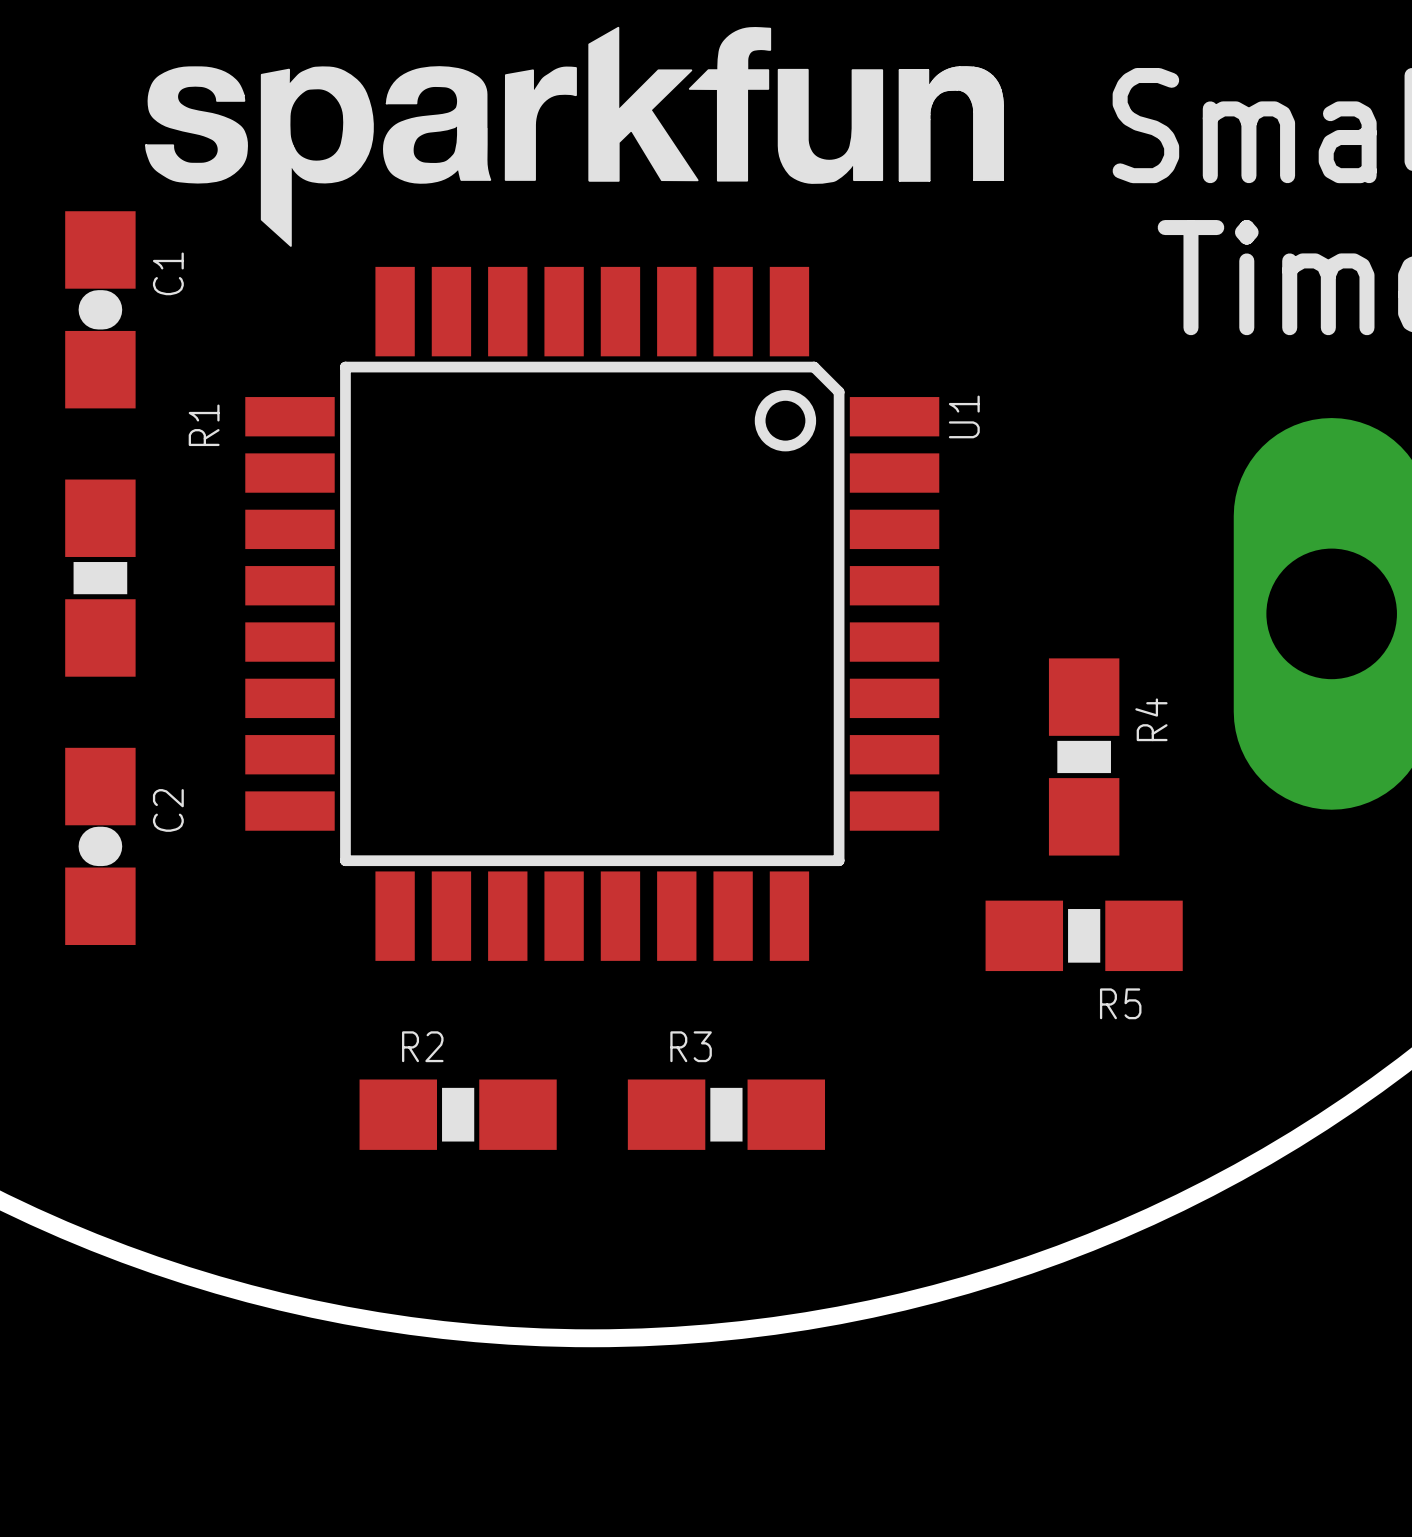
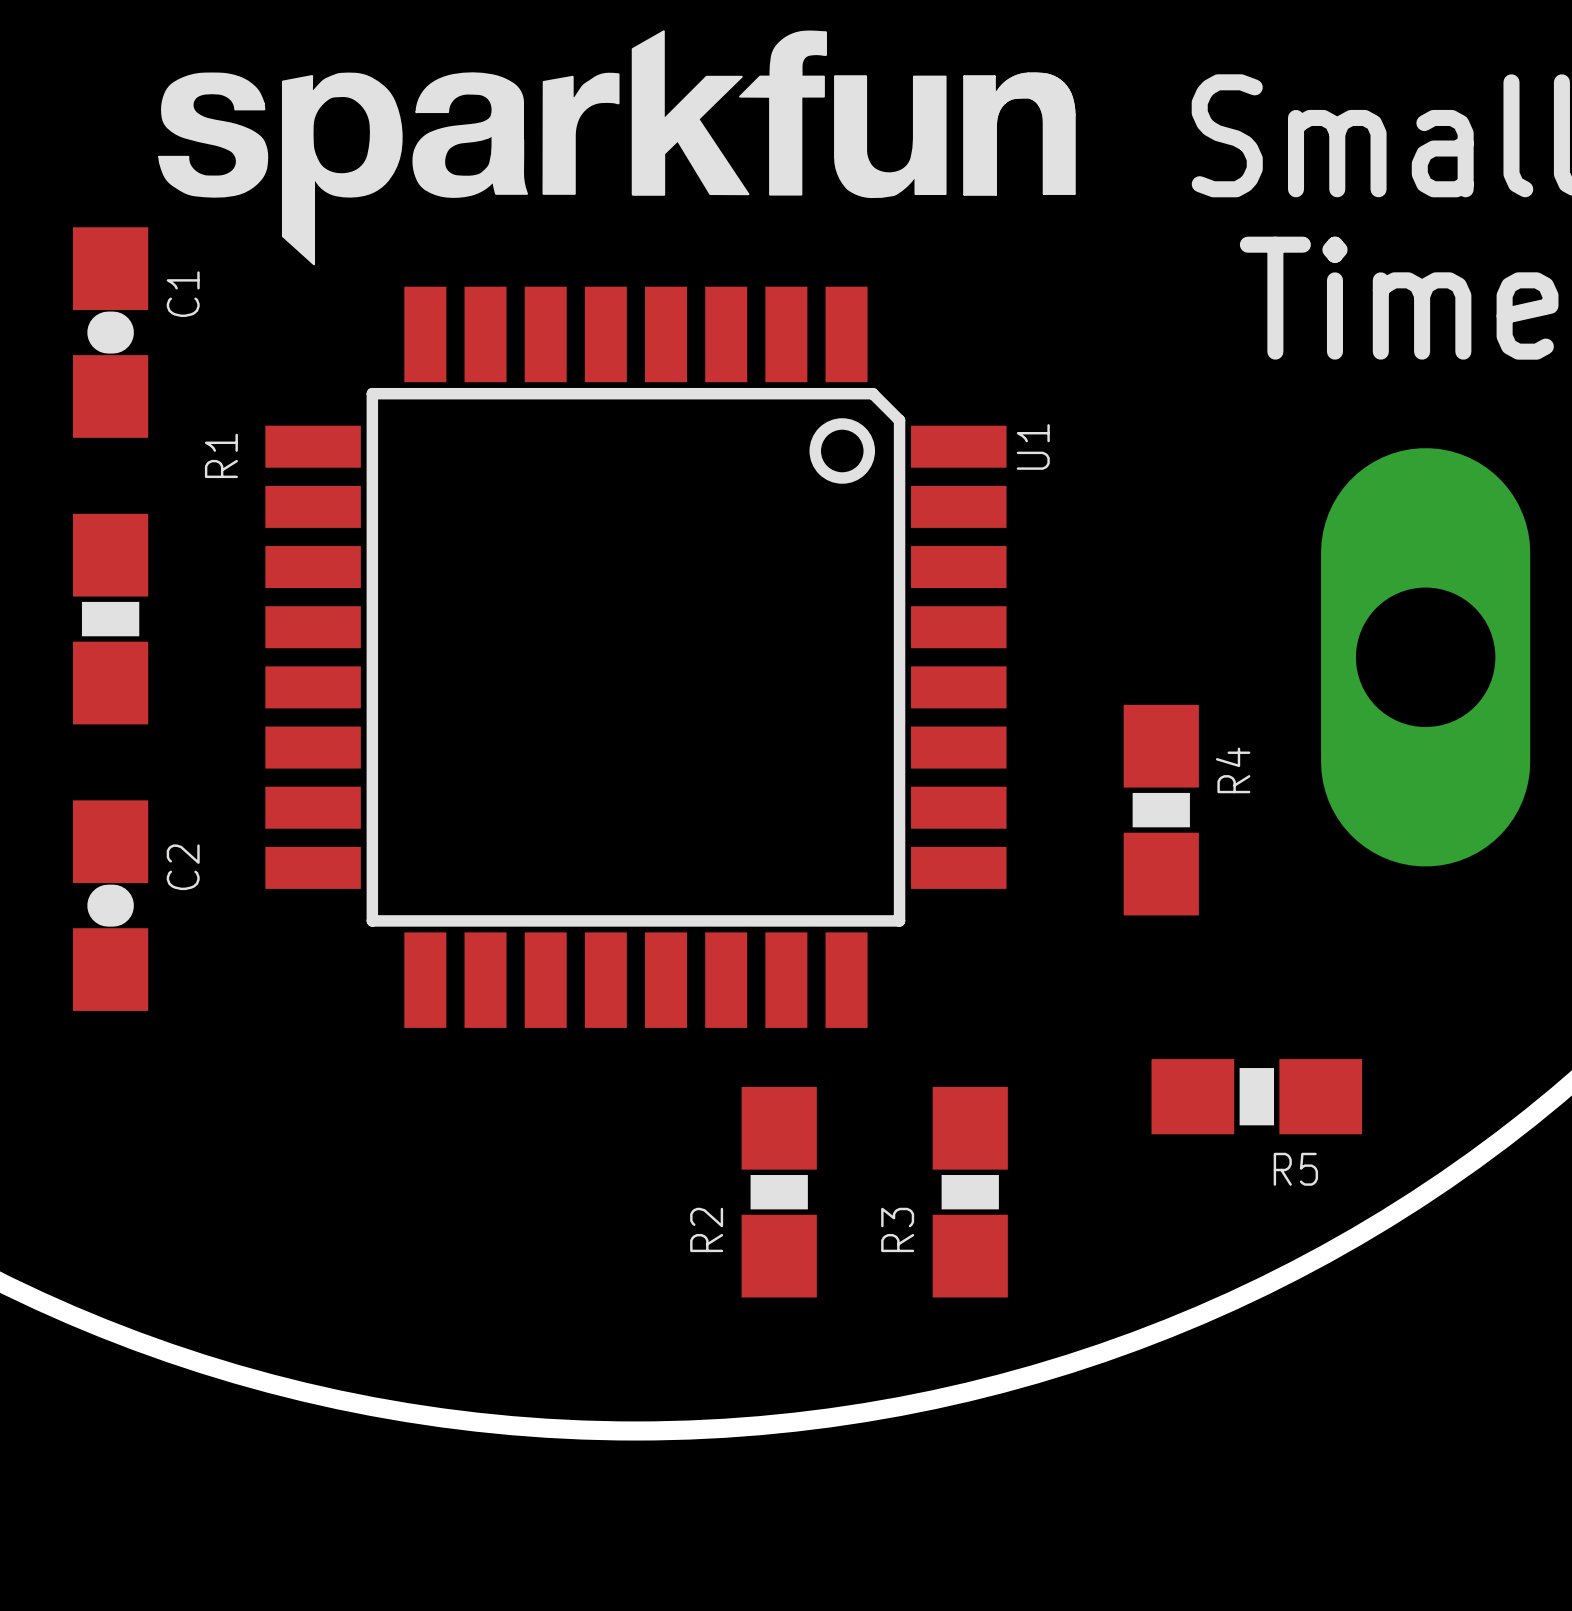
R5 position: (1084, 935) -> (1256, 1096)
R2 rotation: 0° (458, 1114) -> 90° clockwise (779, 1192)
R2 position: (458, 1114) -> (779, 1192)
R3 rotation: 0° (726, 1114) -> 90° clockwise (970, 1192)
R3 position: (726, 1114) -> (970, 1192)

